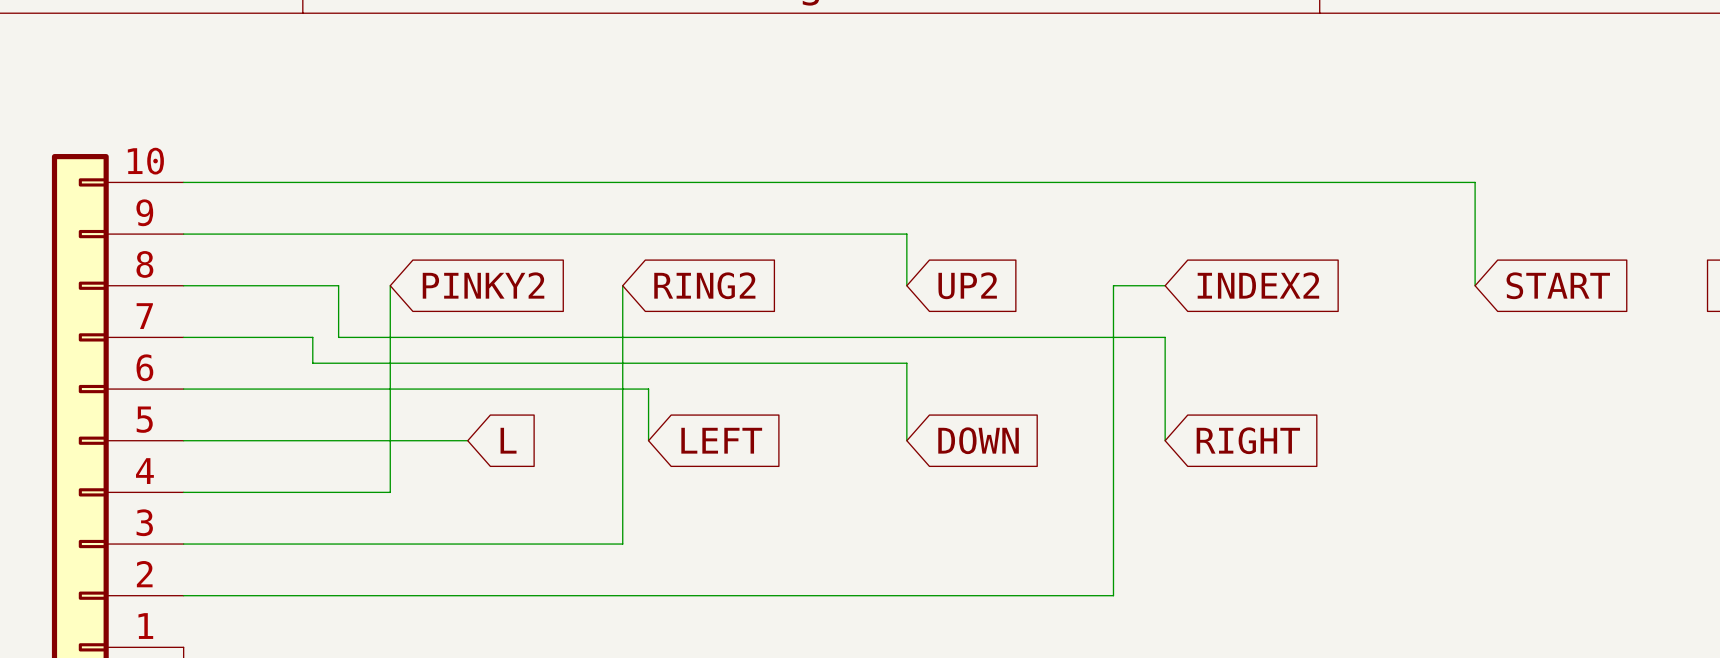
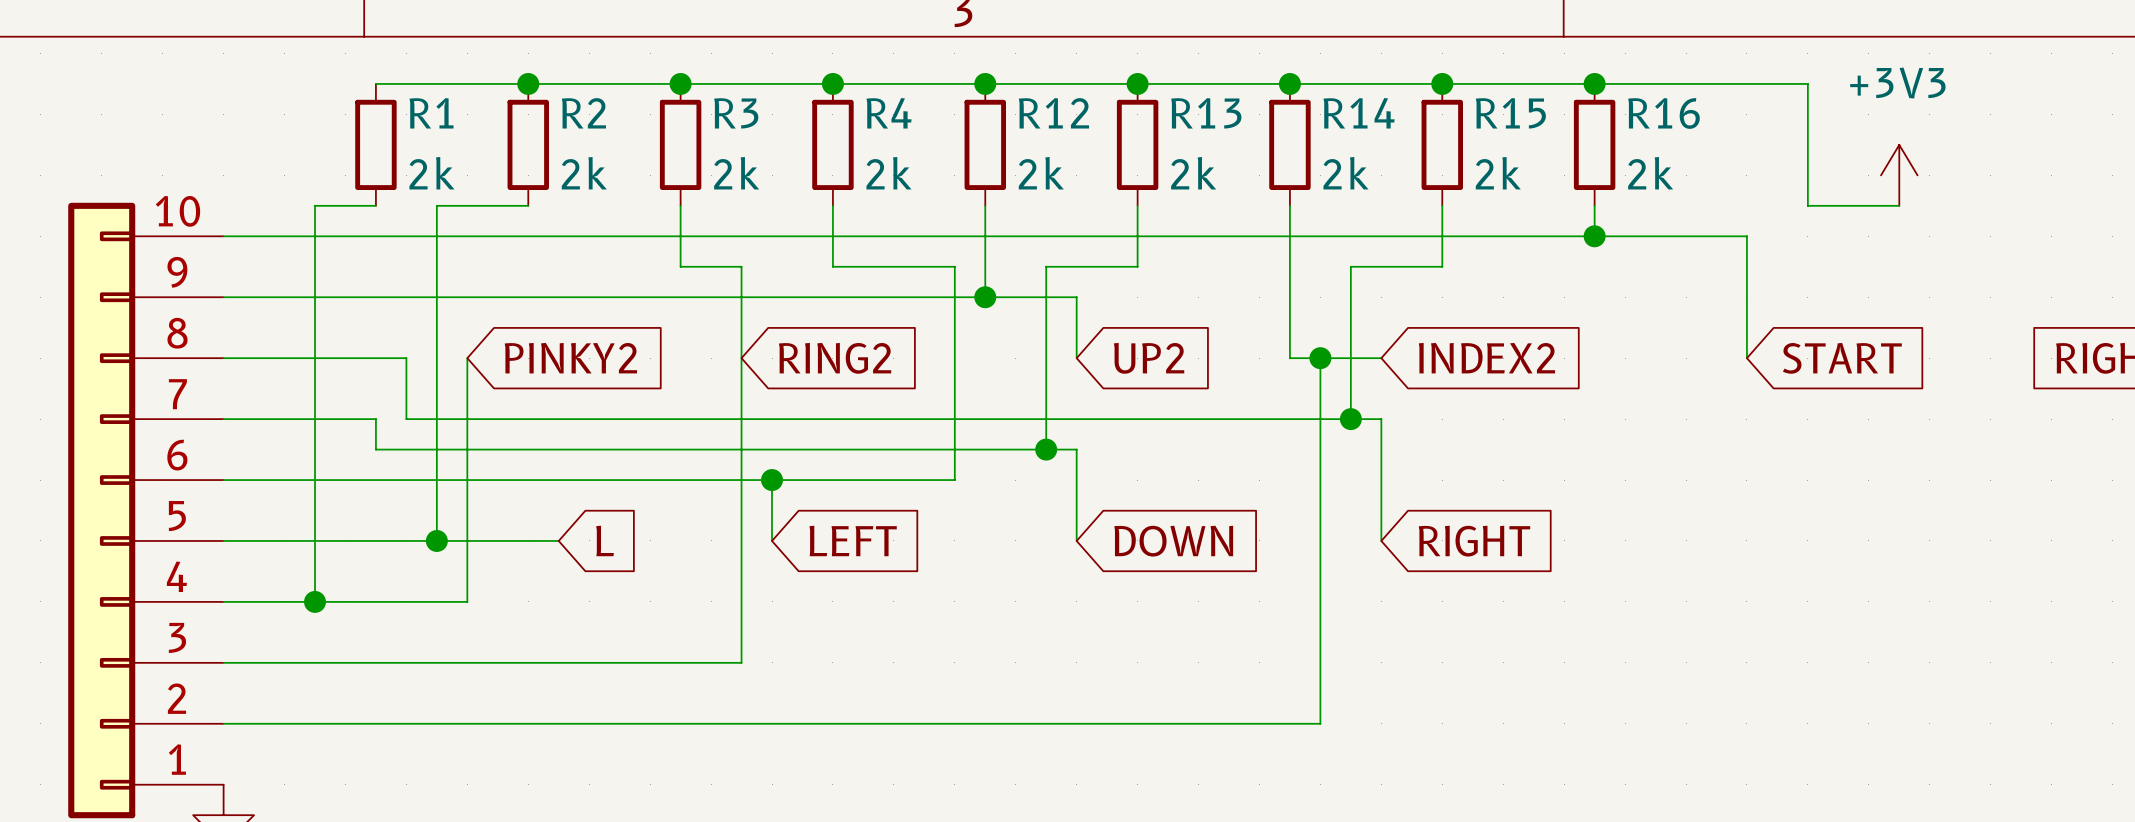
wire: none -> (375, 83) (1807, 83) (1807, 205) (1899, 205)
junction: none -> (528, 83)
junction: none -> (680, 83)
junction: none -> (832, 83)
junction: none -> (985, 83)
junction: none -> (1137, 83)
junction: none -> (1289, 83)
junction: none -> (1442, 83)
junction: none -> (1594, 83)
R1: none -> 2k (375, 144)
R2: none -> 2k (528, 144)
R3: none -> 2k (680, 144)
R4: none -> 2k (832, 144)
R12: none -> 2k (985, 144)
R13: none -> 2k (1137, 144)
R14: none -> 2k (1289, 144)
R15: none -> 2k (1442, 144)
R16: none -> 2k (1594, 144)
power symbol: none -> +3V3 (1899, 175)
wire: none -> (375, 205) (315, 205) (315, 601)
wire: none -> (528, 205) (436, 205) (436, 540)
wire: none -> (680, 205) (680, 266) (741, 266) (741, 358)
wire: none -> (832, 205) (832, 266) (954, 266) (954, 480) (772, 480)
wire: none -> (985, 205) (985, 297)
wire: none -> (1137, 205) (1137, 266) (1046, 266) (1046, 449)
wire: none -> (1289, 205) (1289, 358) (1320, 358)
wire: none -> (1442, 205) (1442, 266) (1350, 266) (1350, 419)
wire: none -> (1594, 205) (1594, 236)
junction: none -> (1594, 236)
junction: none -> (985, 297)
junction: none -> (1320, 358)
junction: none -> (1350, 419)
junction: none -> (1046, 449)
junction: none -> (772, 480)
junction: none -> (436, 540)
junction: none -> (315, 601)

